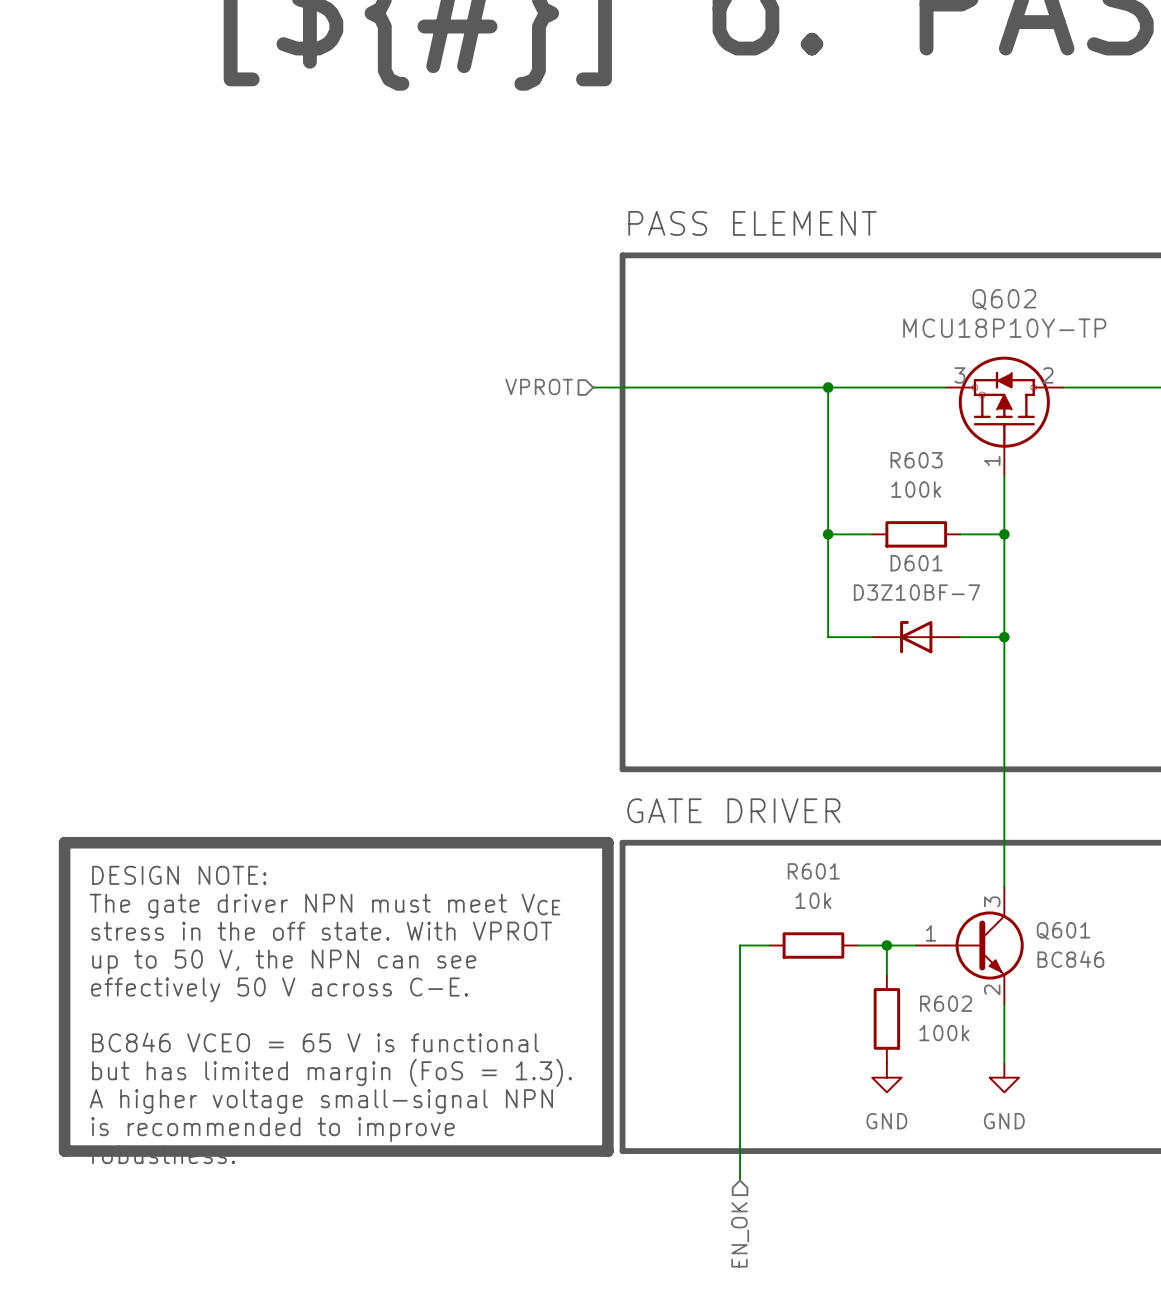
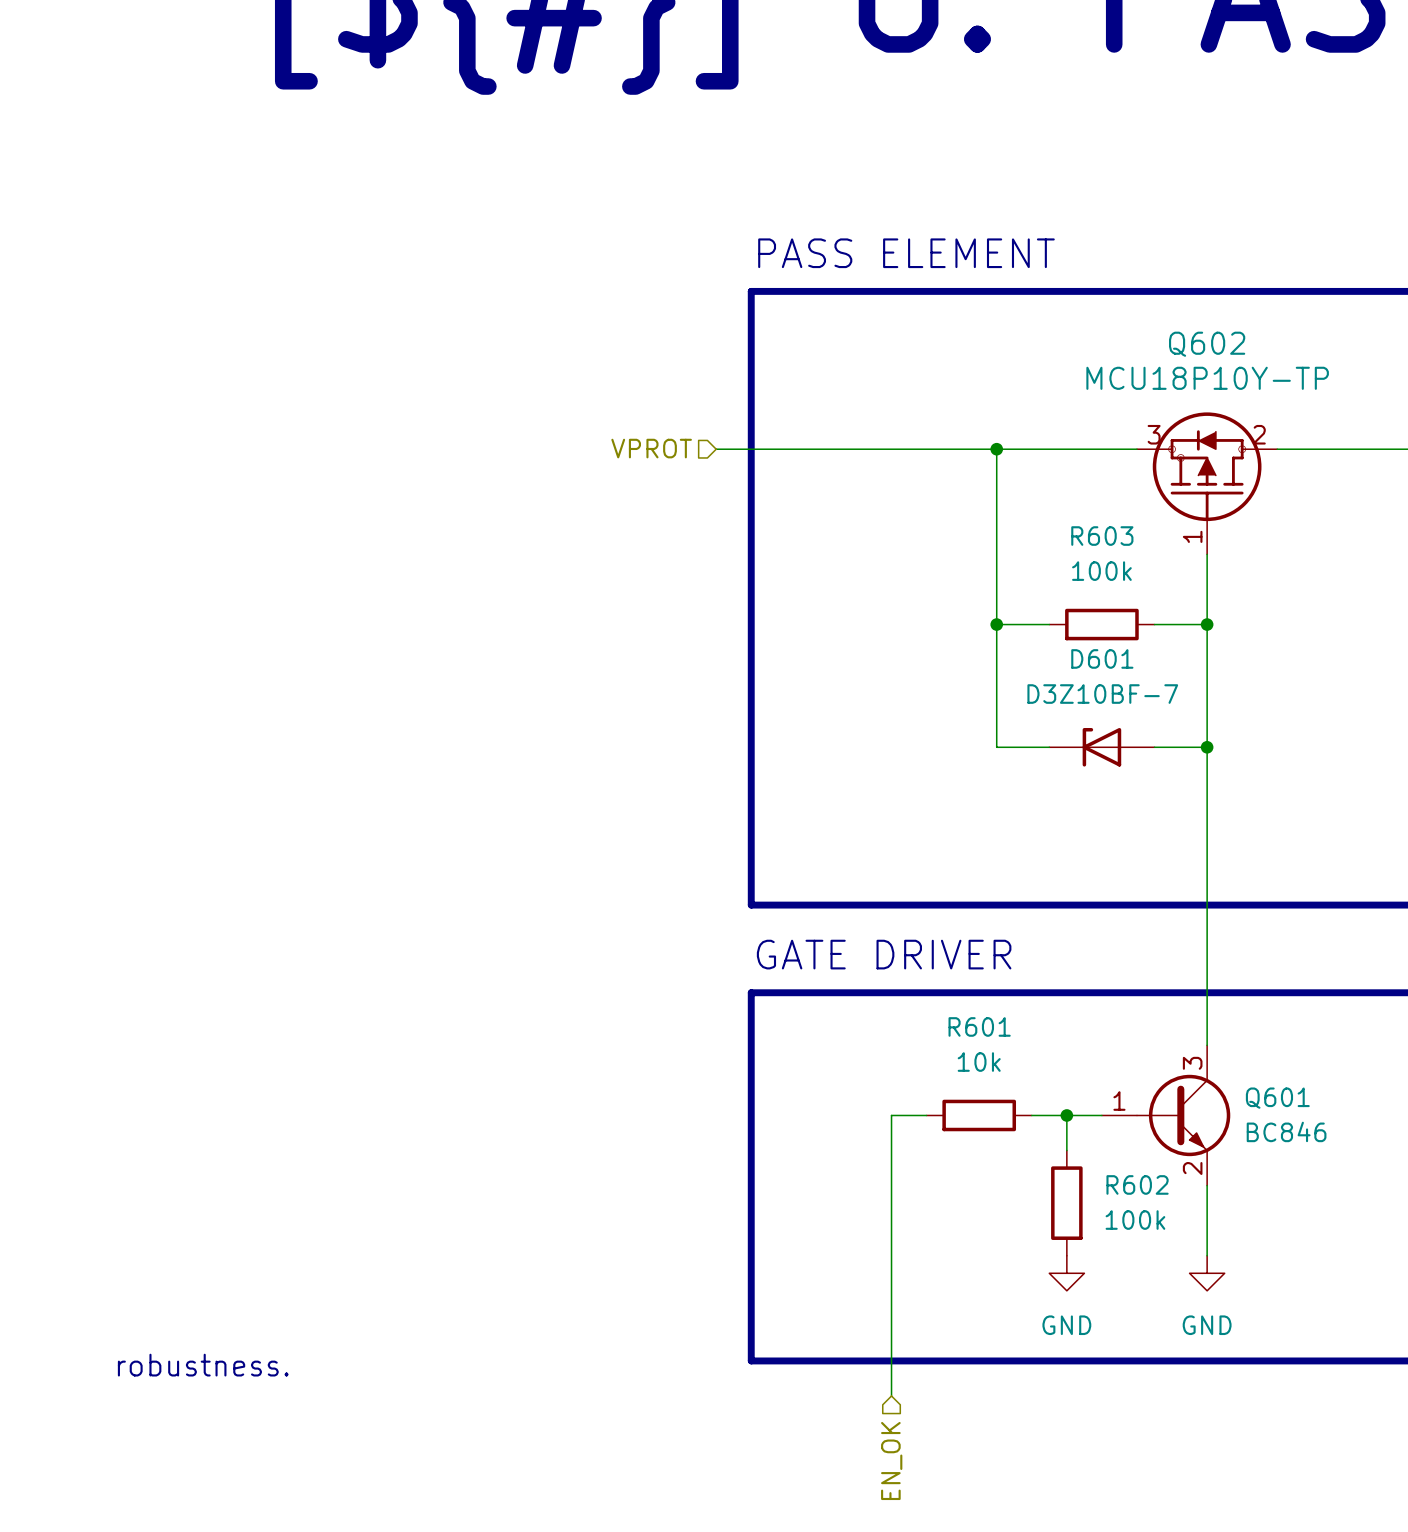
line: (64, 842) (607, 842) (607, 1151) (64, 1151) (64, 842) -> none
text: DESIGN NOTE: (179, 875) -> none
text: The gate driver NPN must meet VCE (324, 906) -> none
text: stress in the off state. With VPROT (321, 931) -> none
text: up to 50 V, the NPN can see (284, 961) -> none
text: effectively 50 V across C-E. (279, 989) -> none
text: BC846 VCEO = 65 V is functional (315, 1042) -> none
text: but has limited margin (FoS = 1.3). (332, 1072) -> none
text: A higher voltage small-signal NPN (321, 1101) -> none
text: is recommended to improve (273, 1129) -> none

